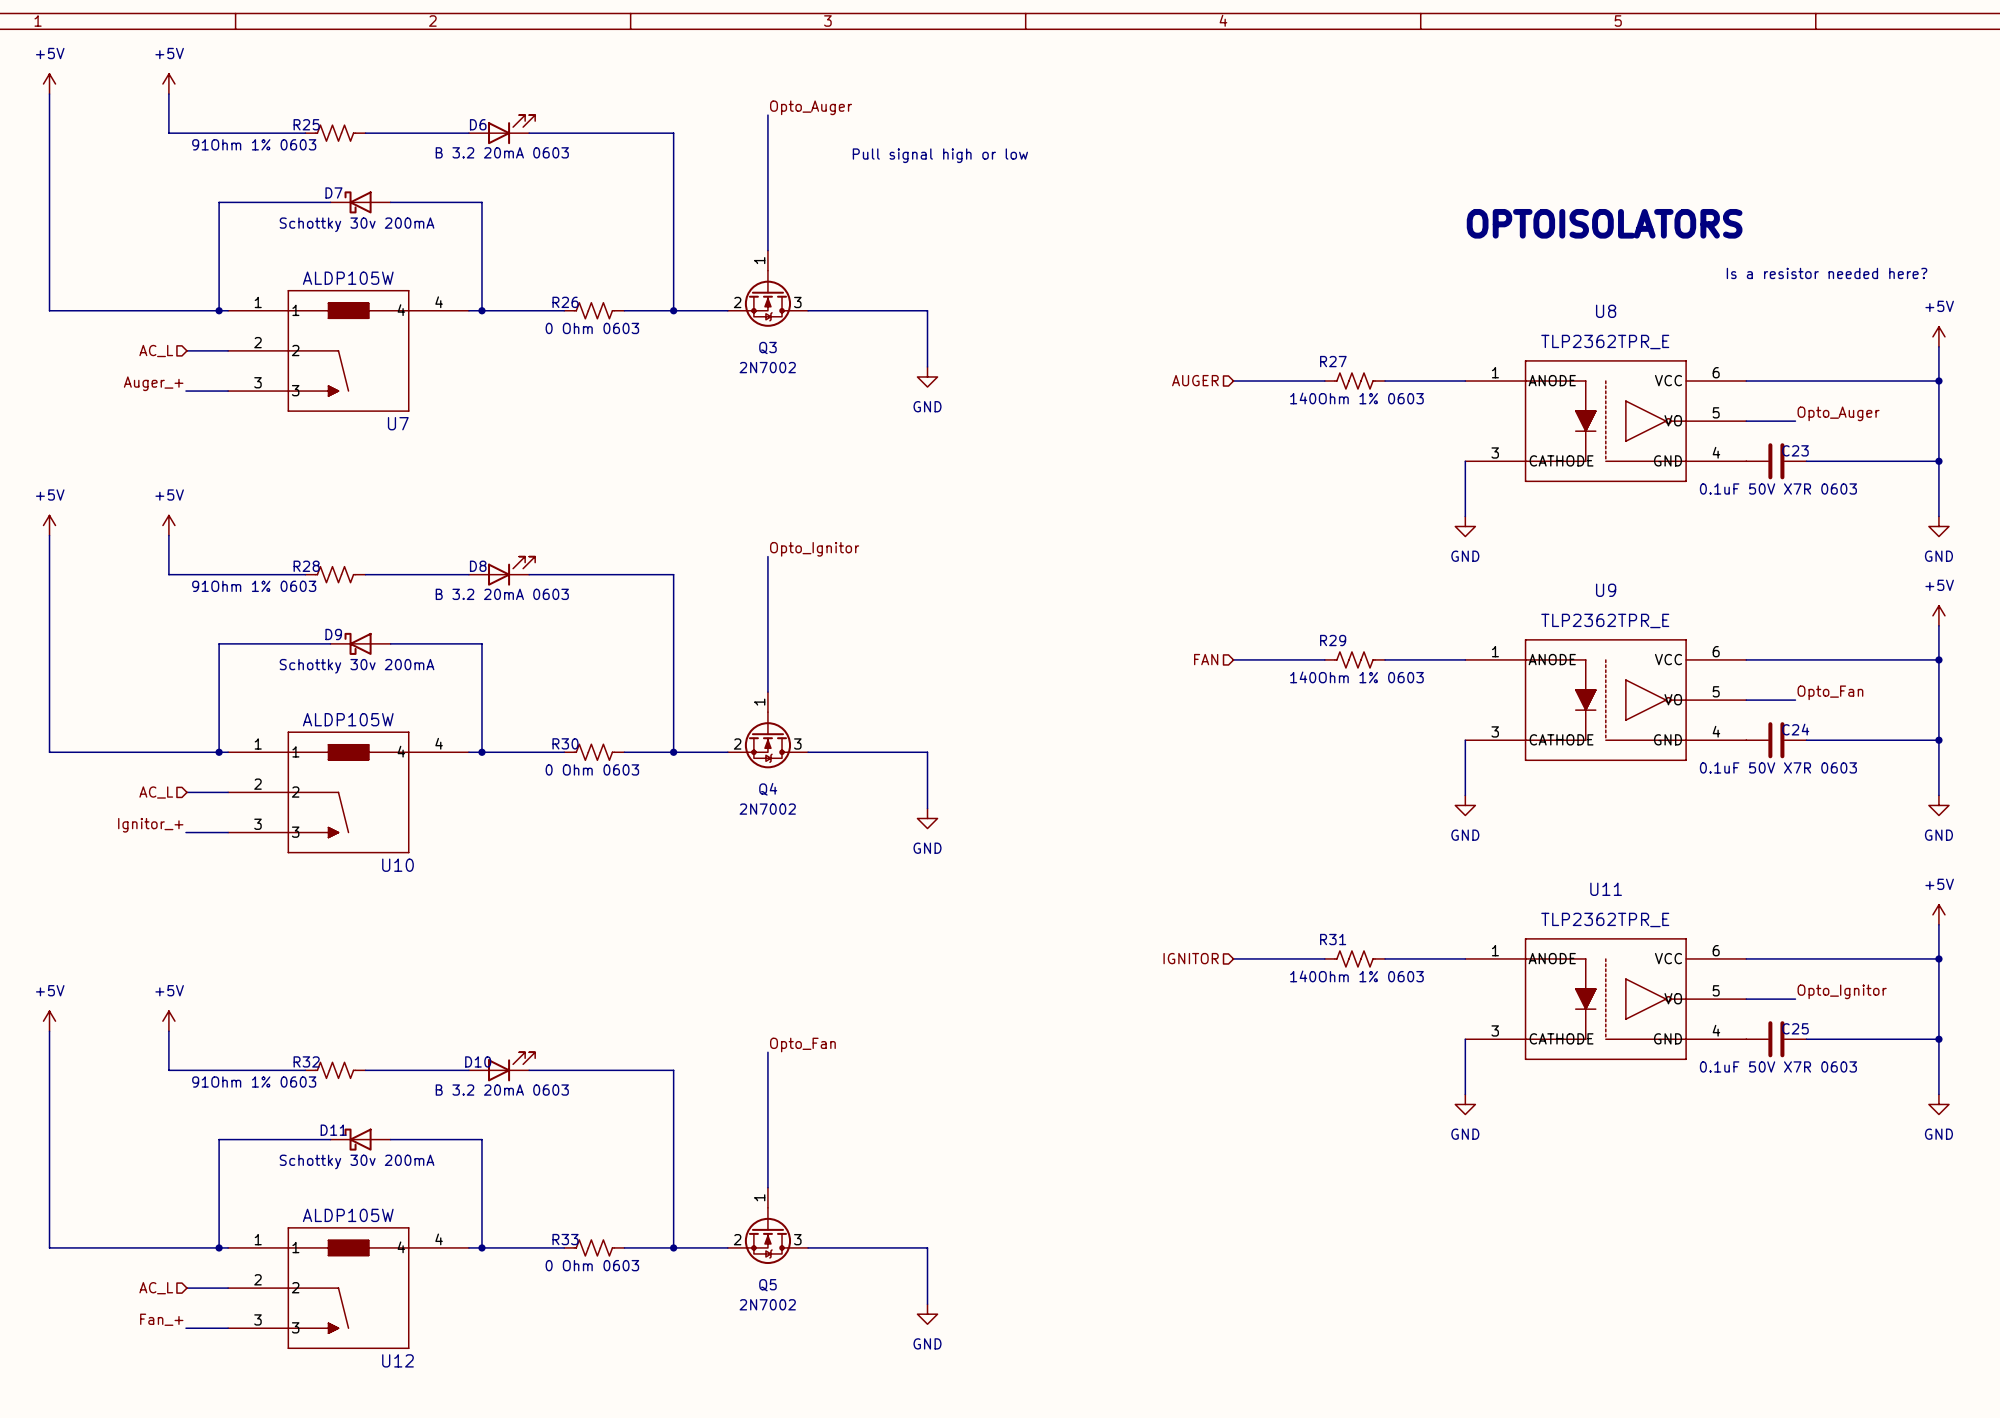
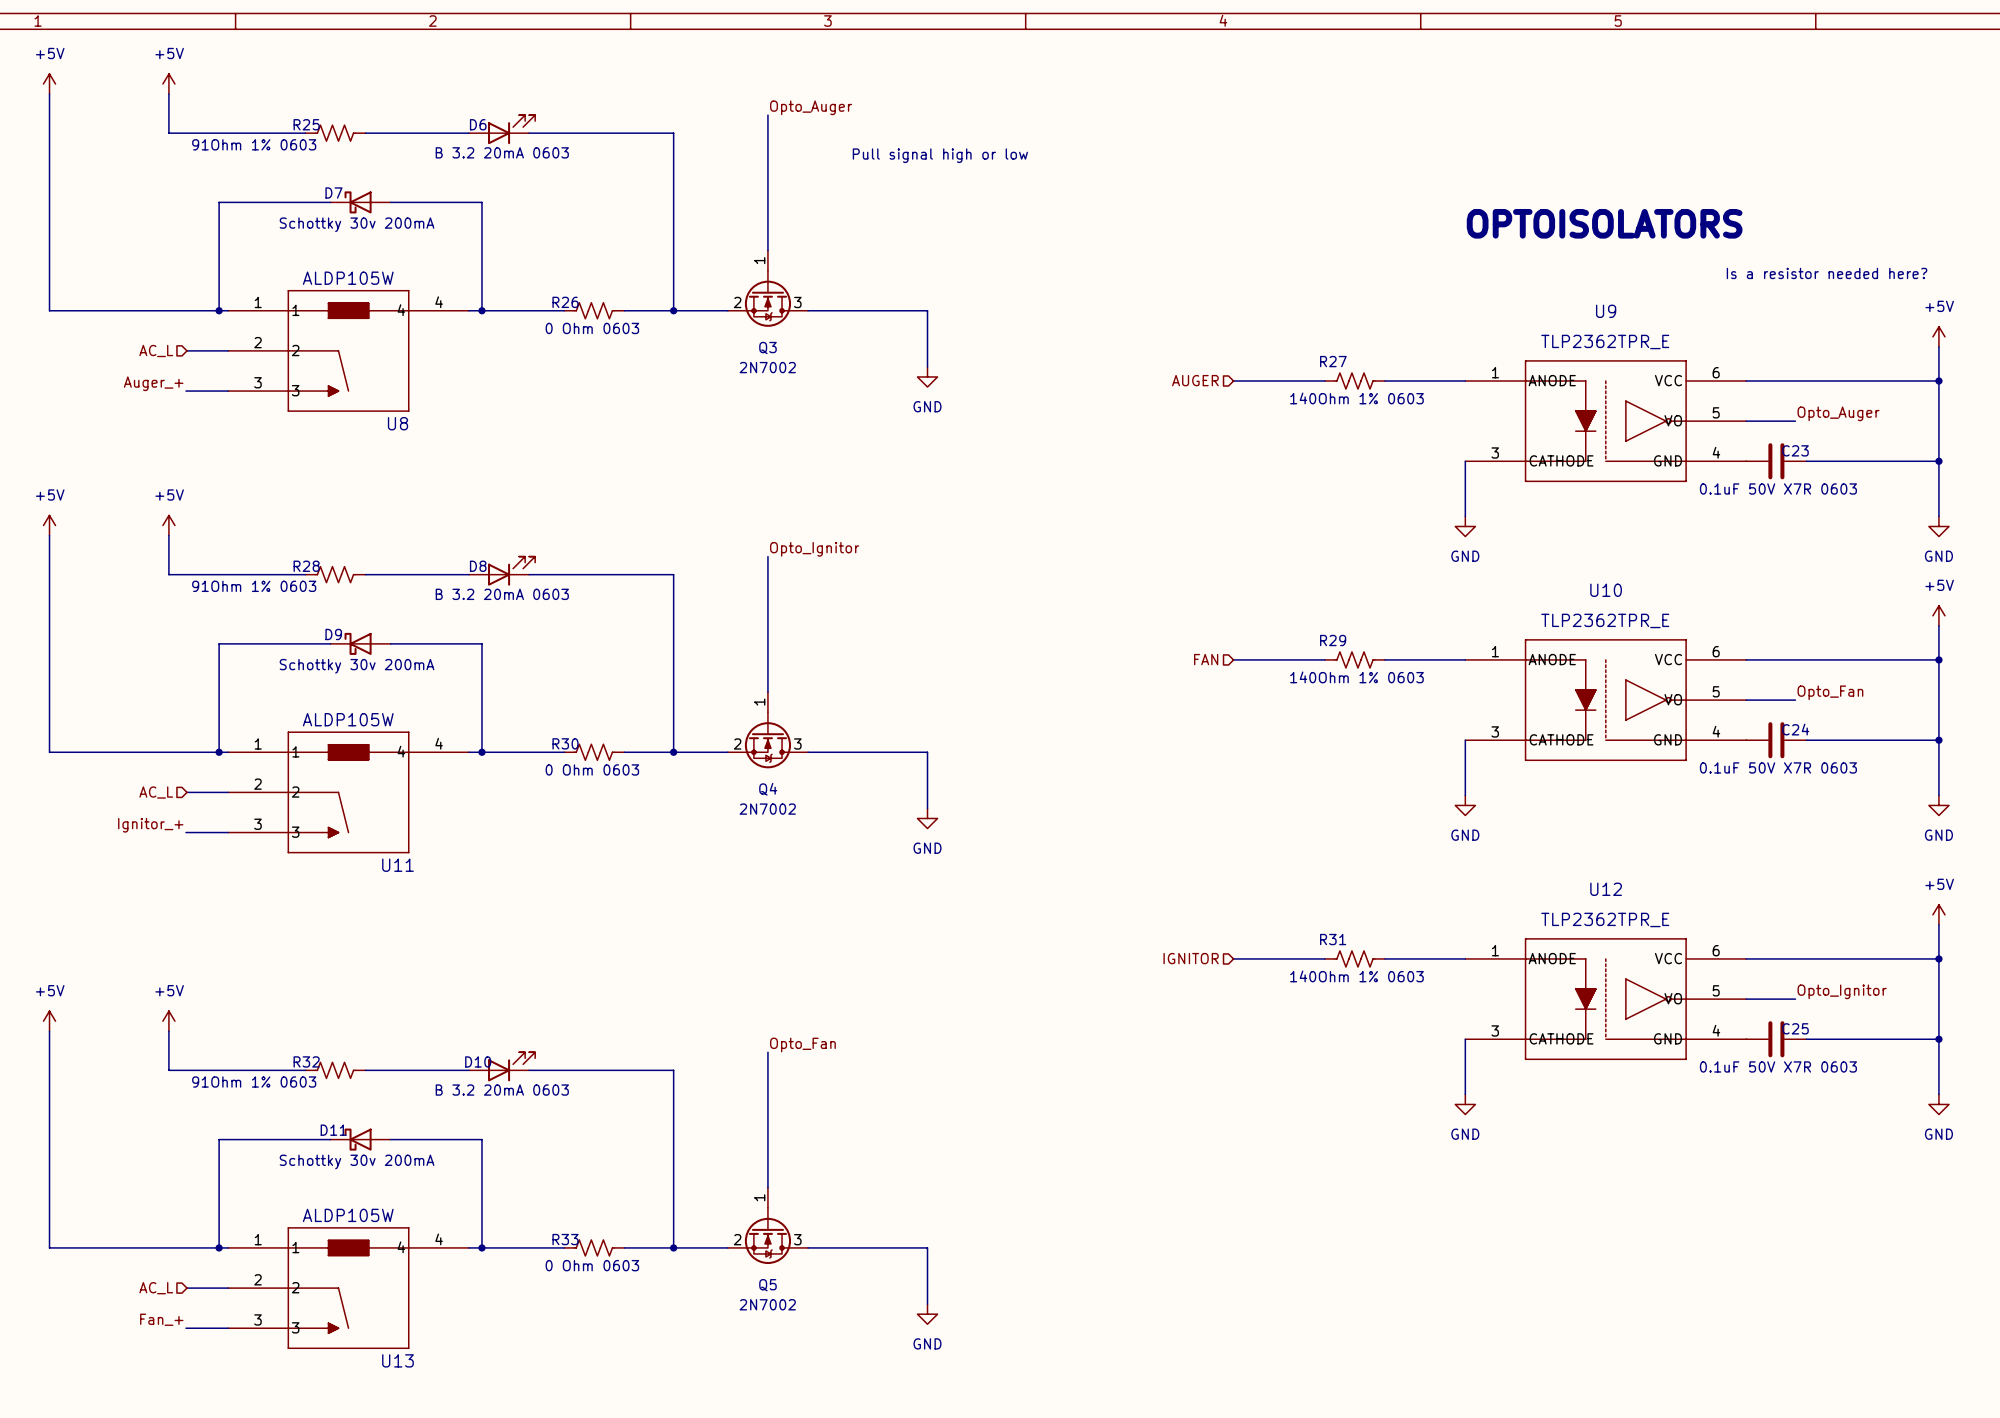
U8 name: U8 (1606, 311) -> U9 (1606, 311)
U7 name: U7 (398, 423) -> U8 (397, 423)
U9 name: U9 (1606, 590) -> U10 (1606, 590)
U10 name: U10 (397, 865) -> U11 (397, 865)
U11 name: U11 (1606, 889) -> U12 (1606, 889)
U12 name: U12 (397, 1360) -> U13 (397, 1360)

